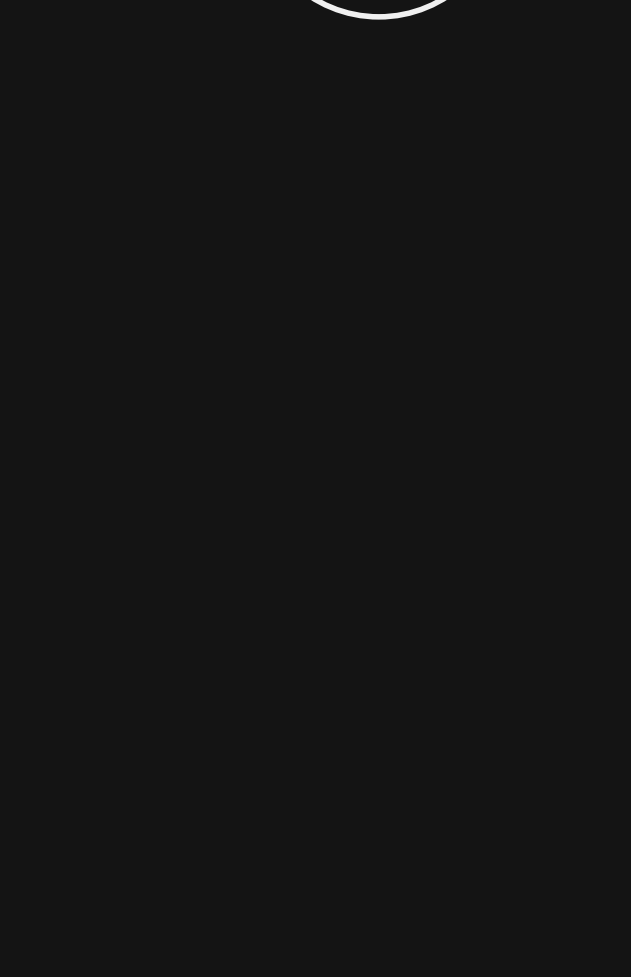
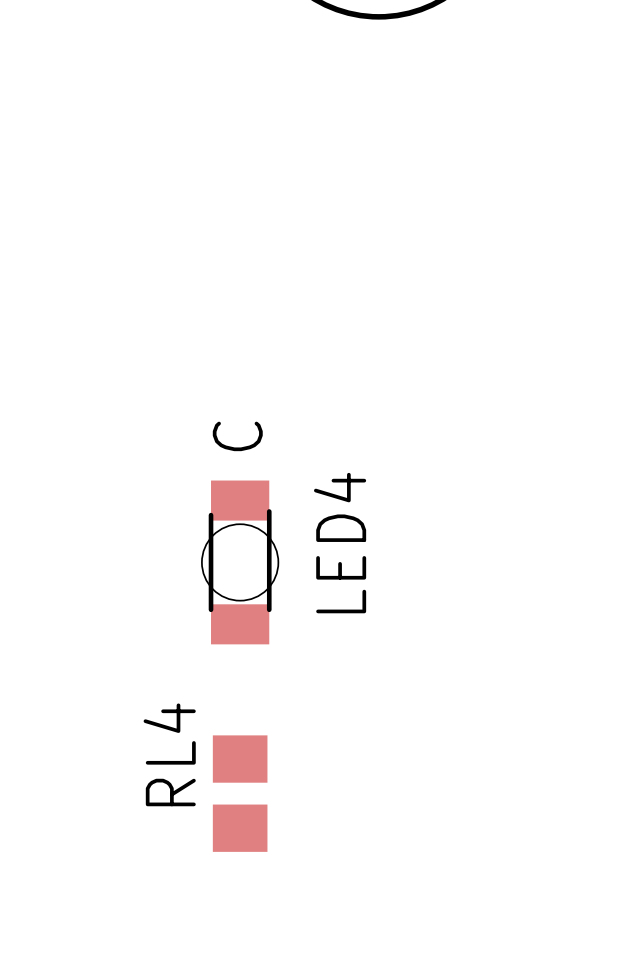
LED4: none -> (240, 562)
RL4: none -> (240, 793)

